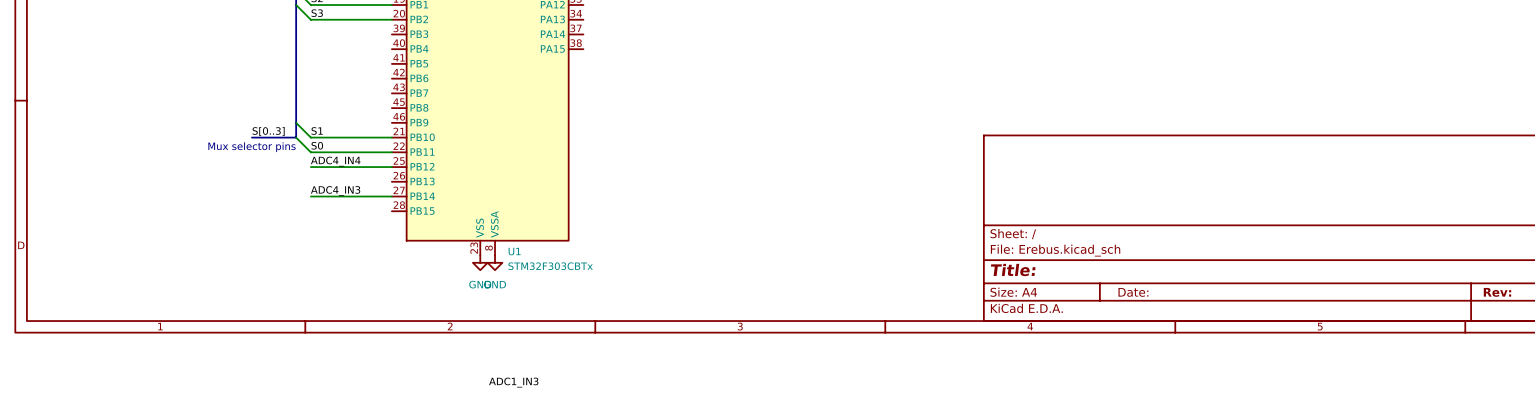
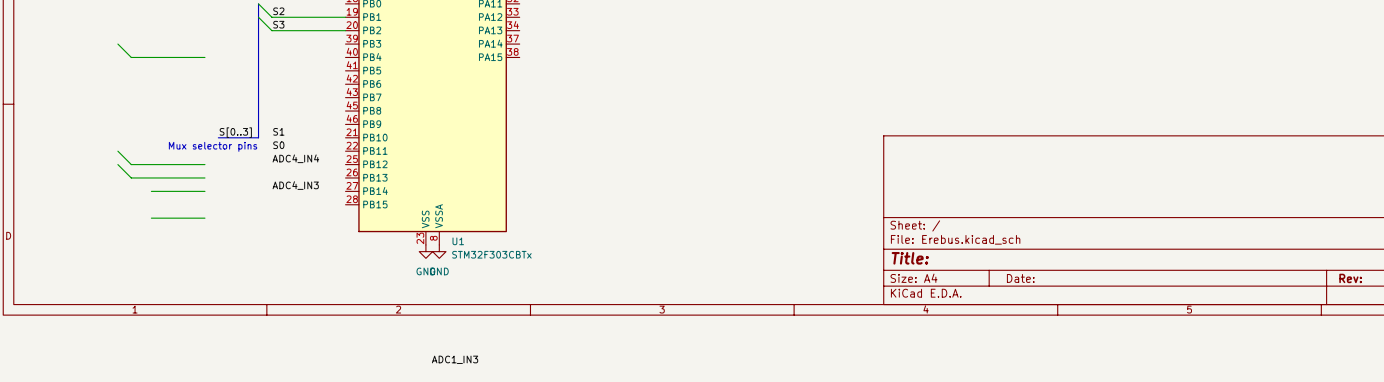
wire: none -> (117, 44) (131, 57) (204, 57)
wire: (296, 122) (310, 137) (391, 137) -> none
wire: (296, 137) (310, 152) (391, 152) -> none
wire: none -> (117, 151) (131, 164) (204, 164)
wire: none -> (117, 164) (131, 177) (204, 177)
wire: (310, 167) (391, 167) -> none
wire: none -> (151, 191) (204, 191)
wire: (310, 196) (391, 196) -> none
wire: none -> (151, 218) (204, 218)

